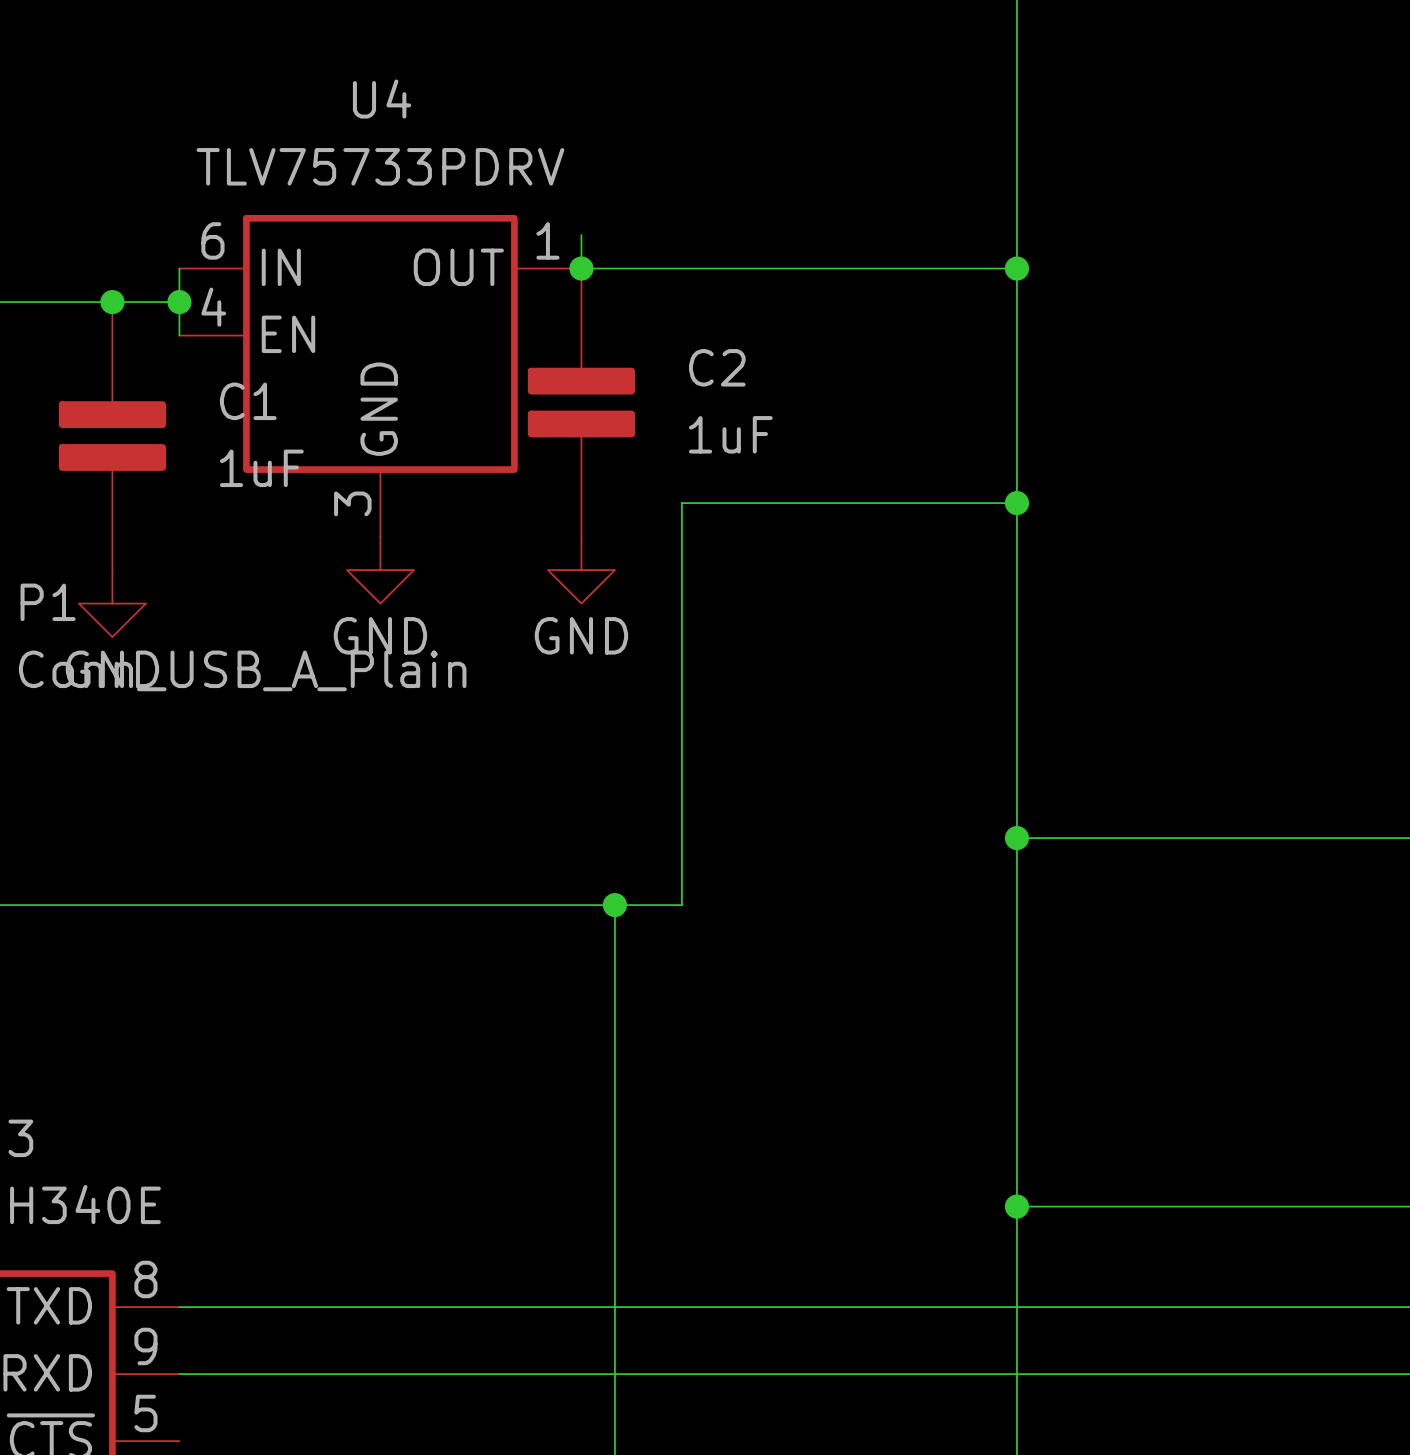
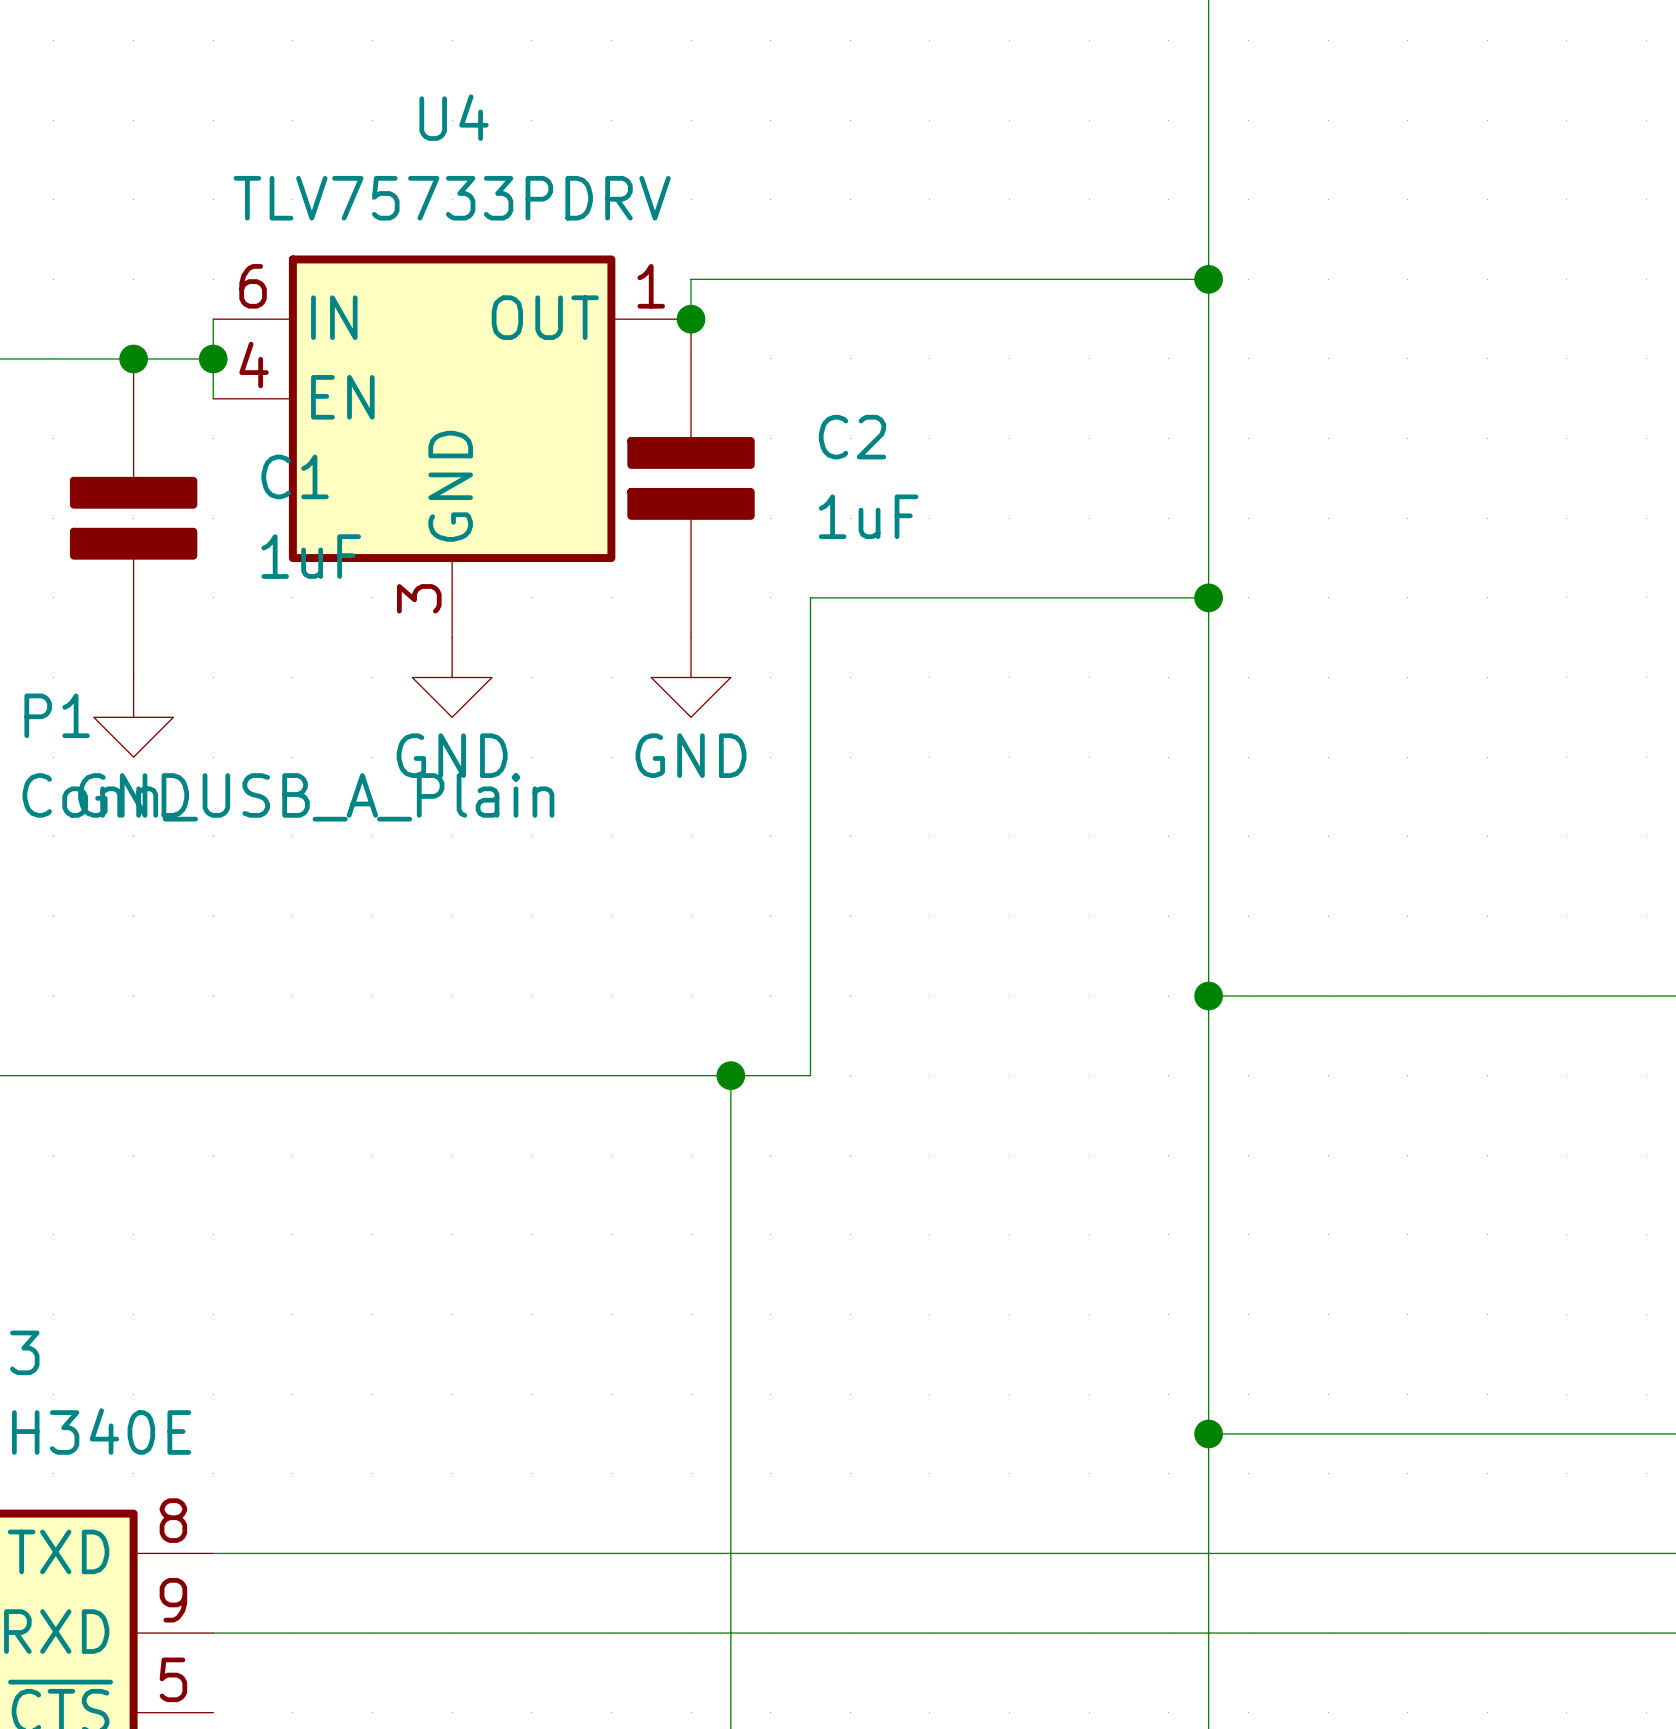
wire: (581, 268) (1016, 268) -> (691, 279) (1208, 279)
junction position: (1016, 268) -> (1208, 279)

